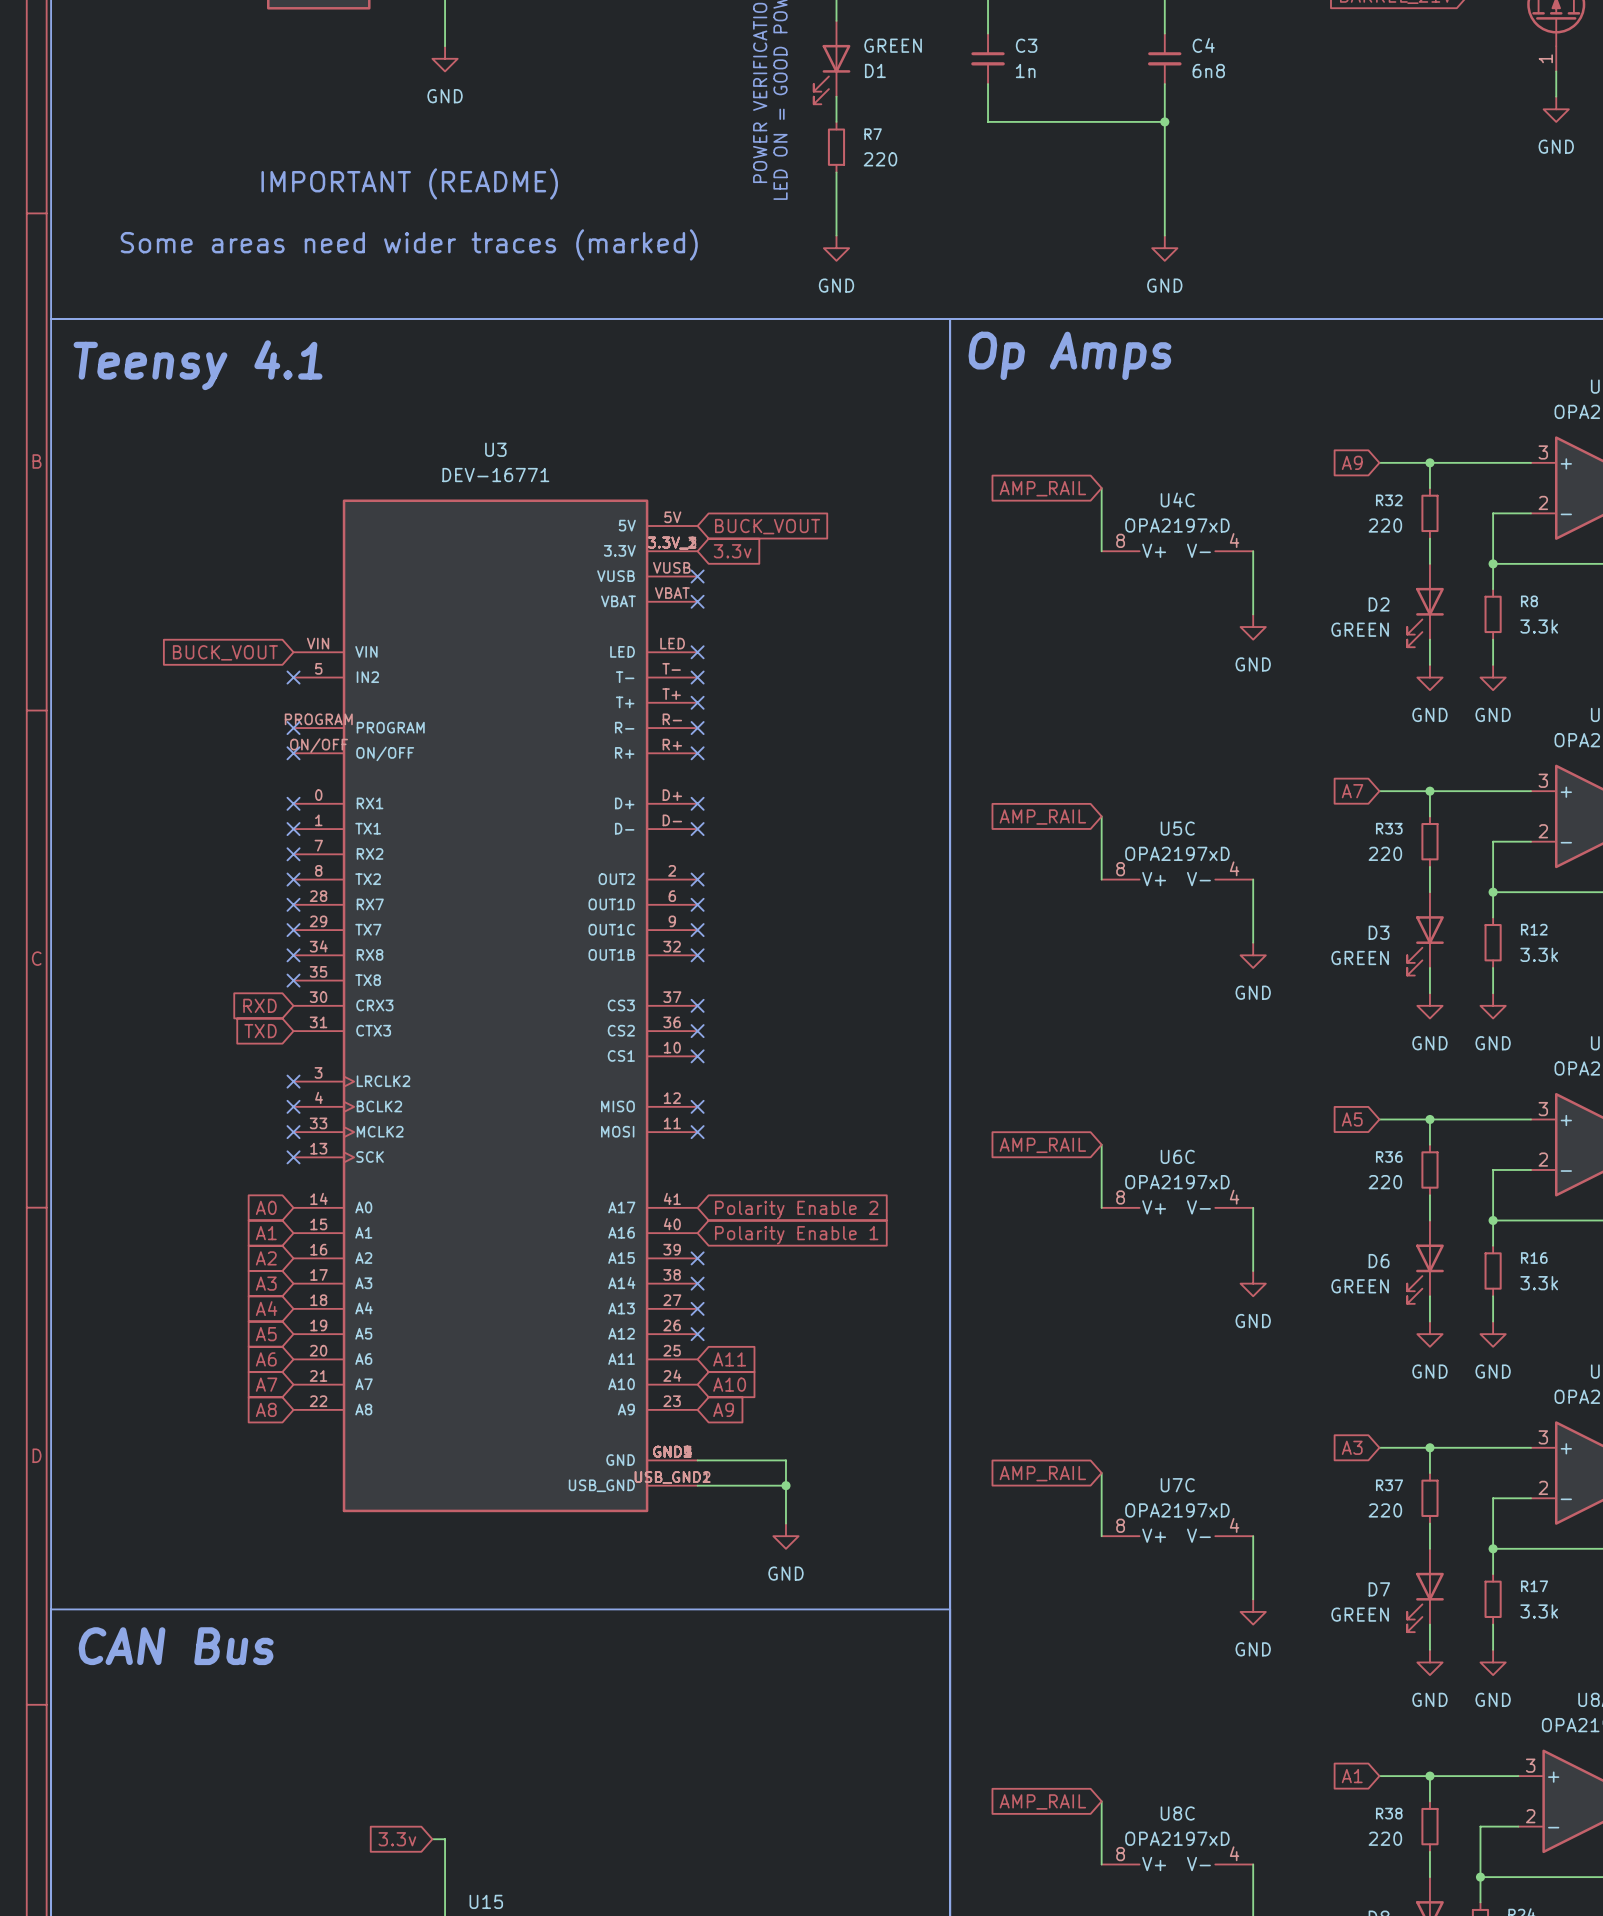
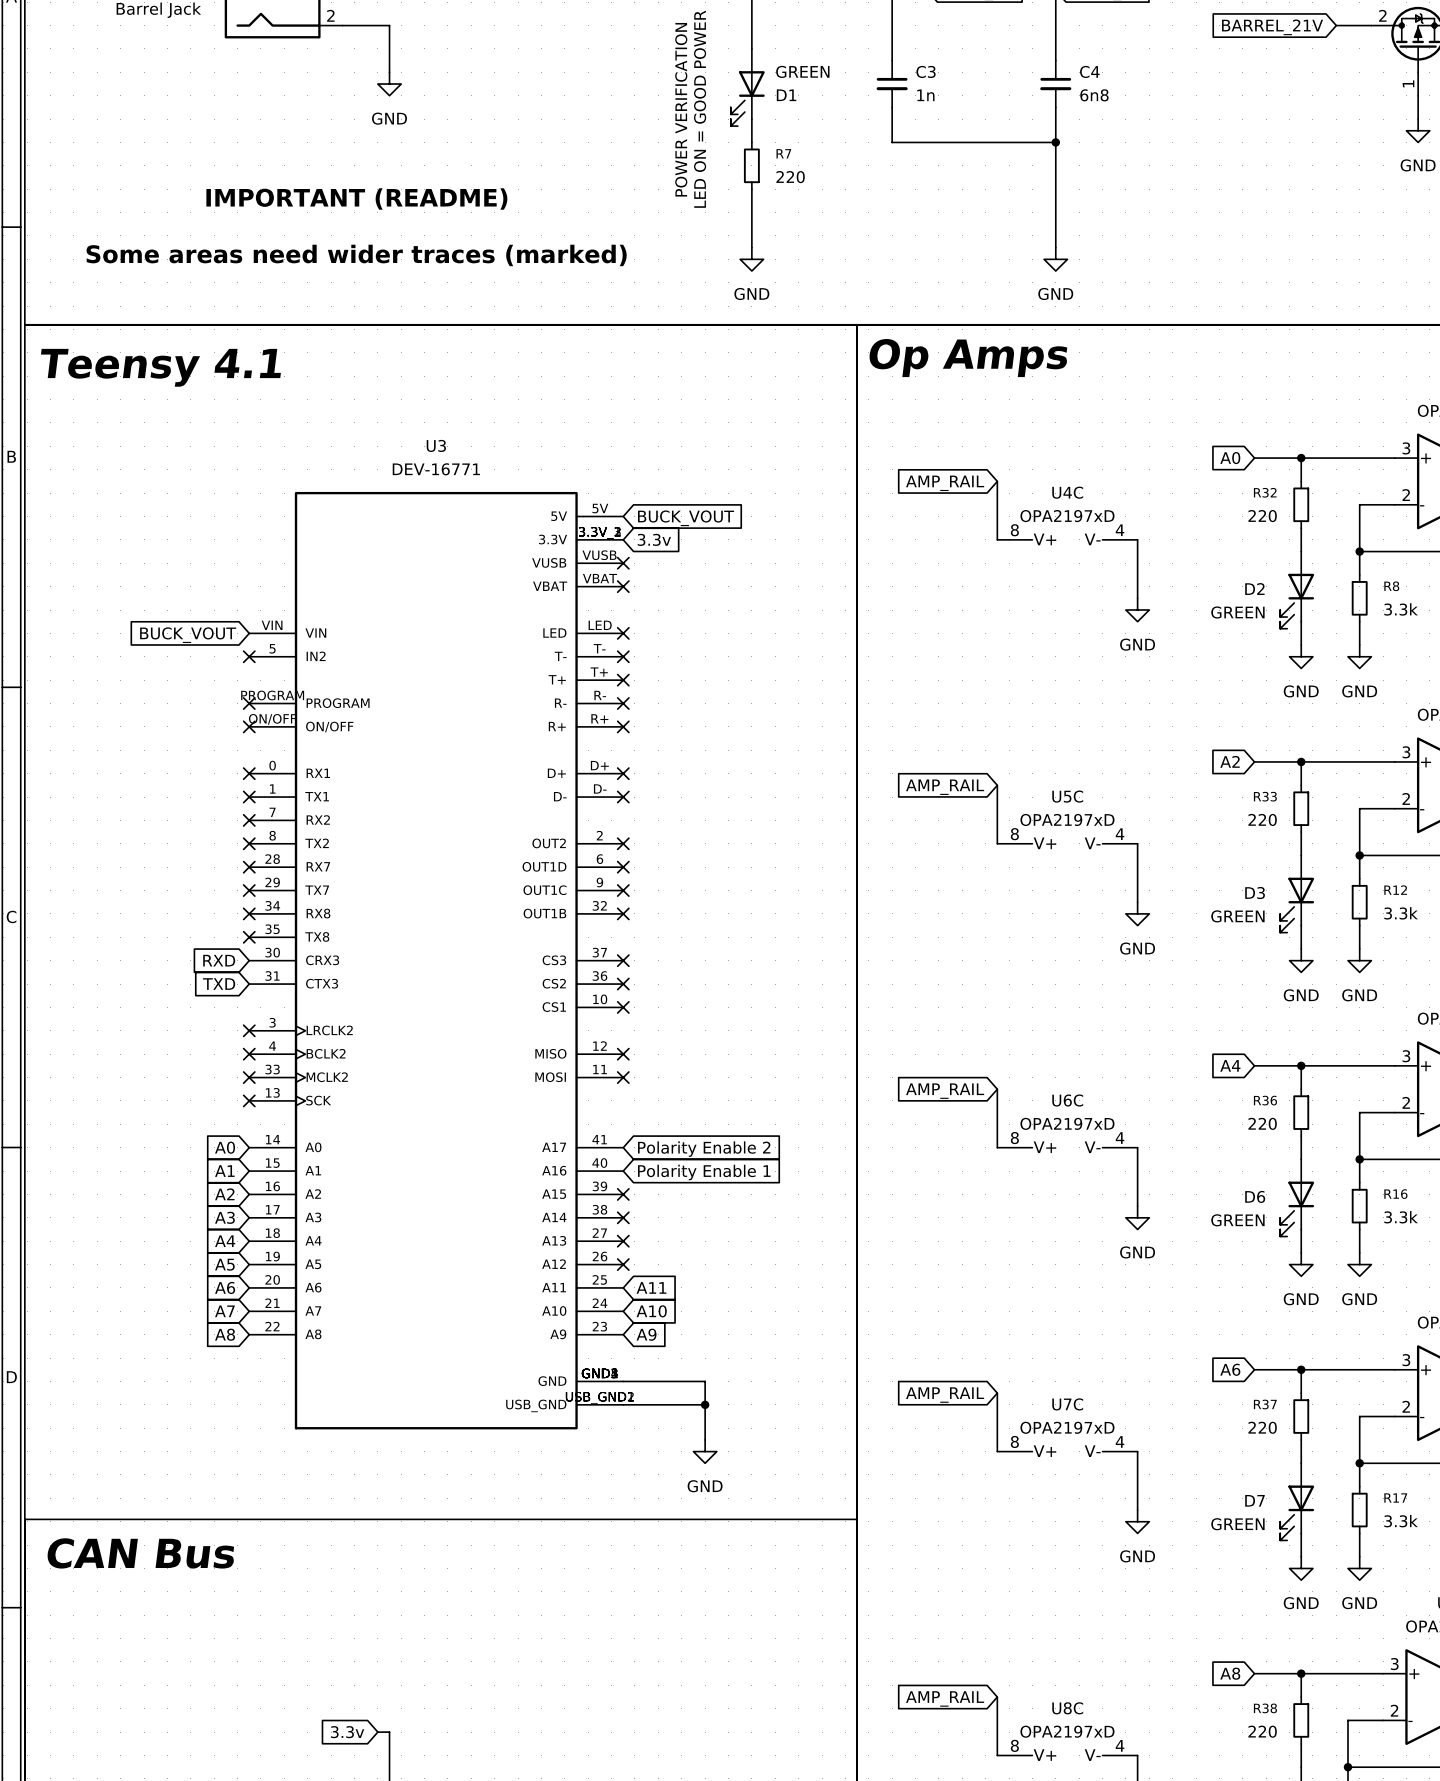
global label: A9 (1352, 462) -> A0 (1230, 458)
global label: A7 (1352, 791) -> A2 (1230, 761)
global label: A5 (1352, 1119) -> A4 (1230, 1065)
global label: A3 (1352, 1447) -> A6 (1230, 1369)
global label: A1 (1352, 1776) -> A8 (1230, 1673)

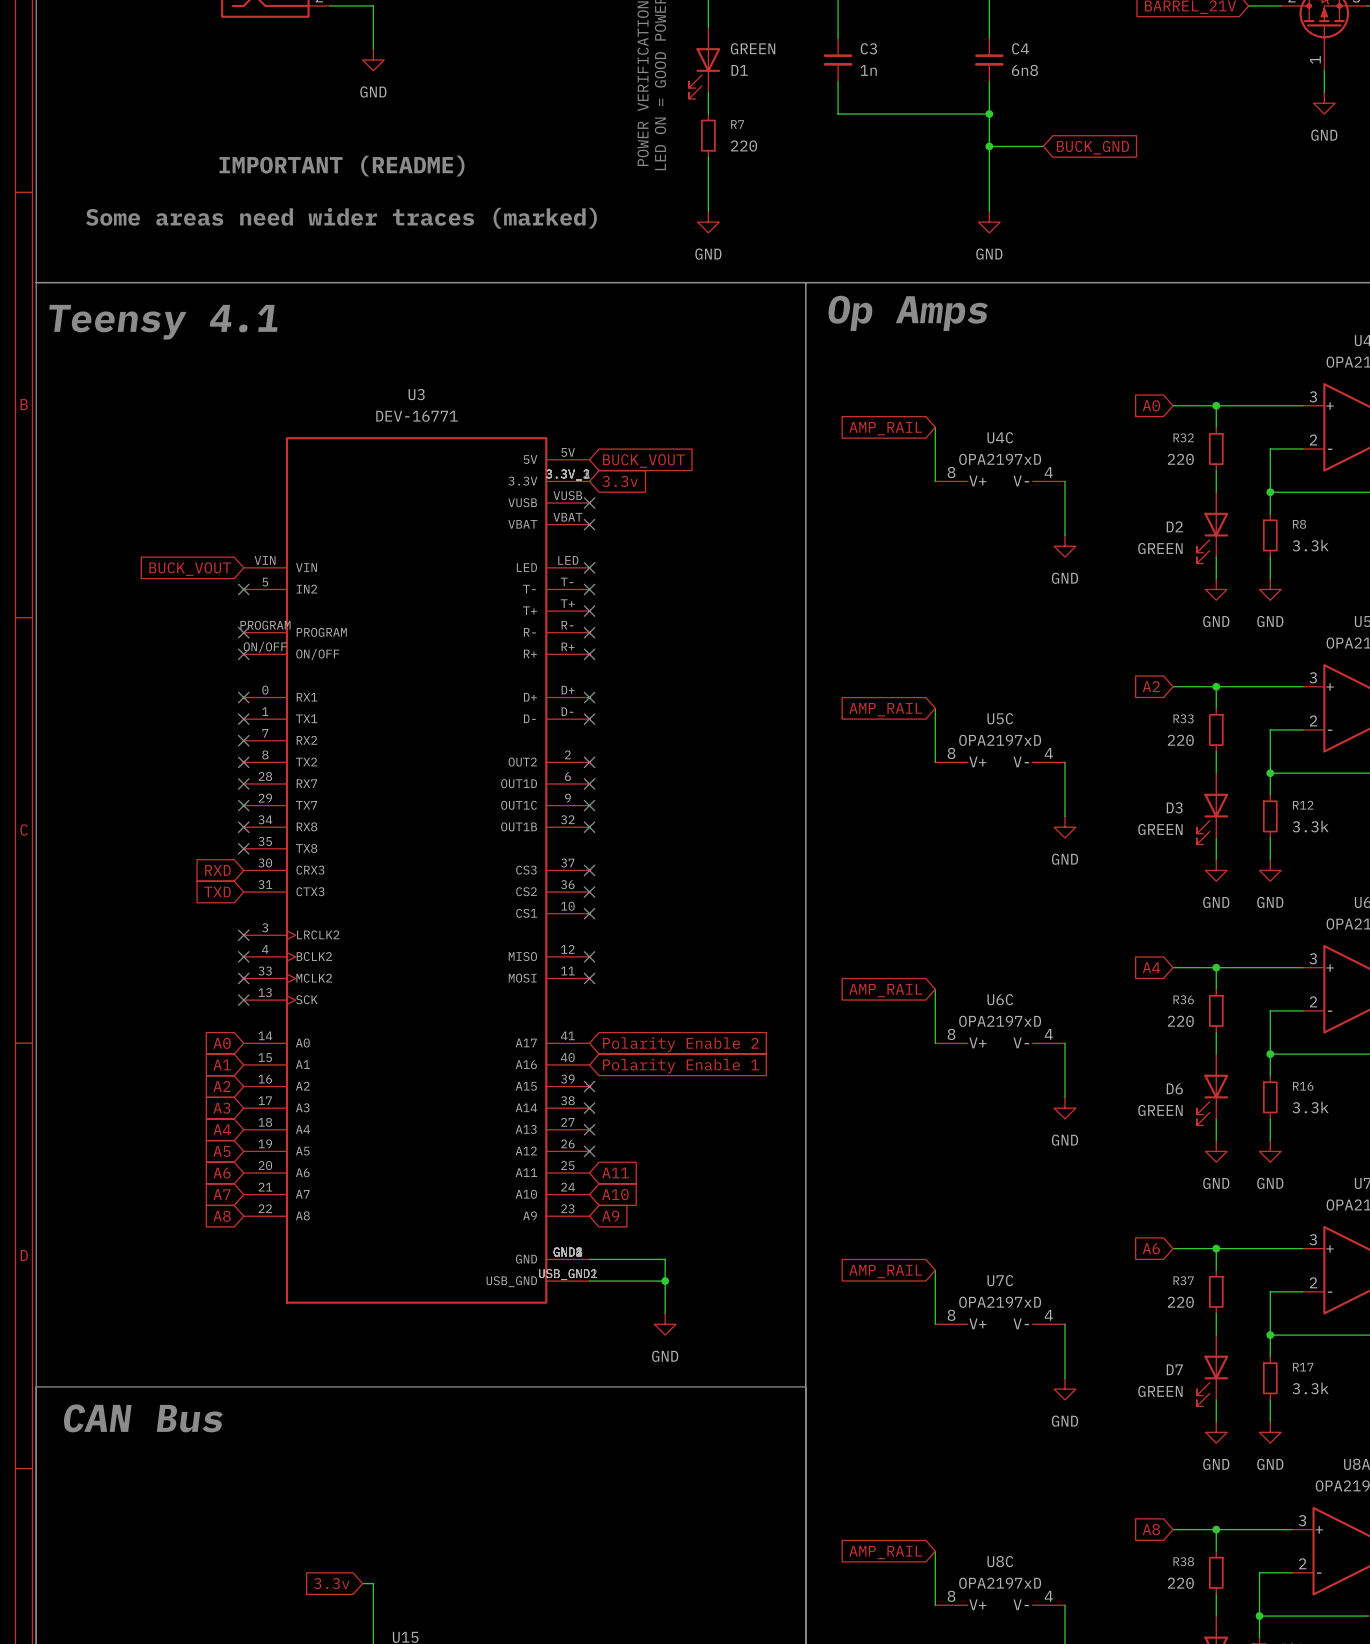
wire: none -> (989, 146) (1043, 146)
junction: none -> (989, 146)
global label: none -> BUCK_GND (1092, 147)

